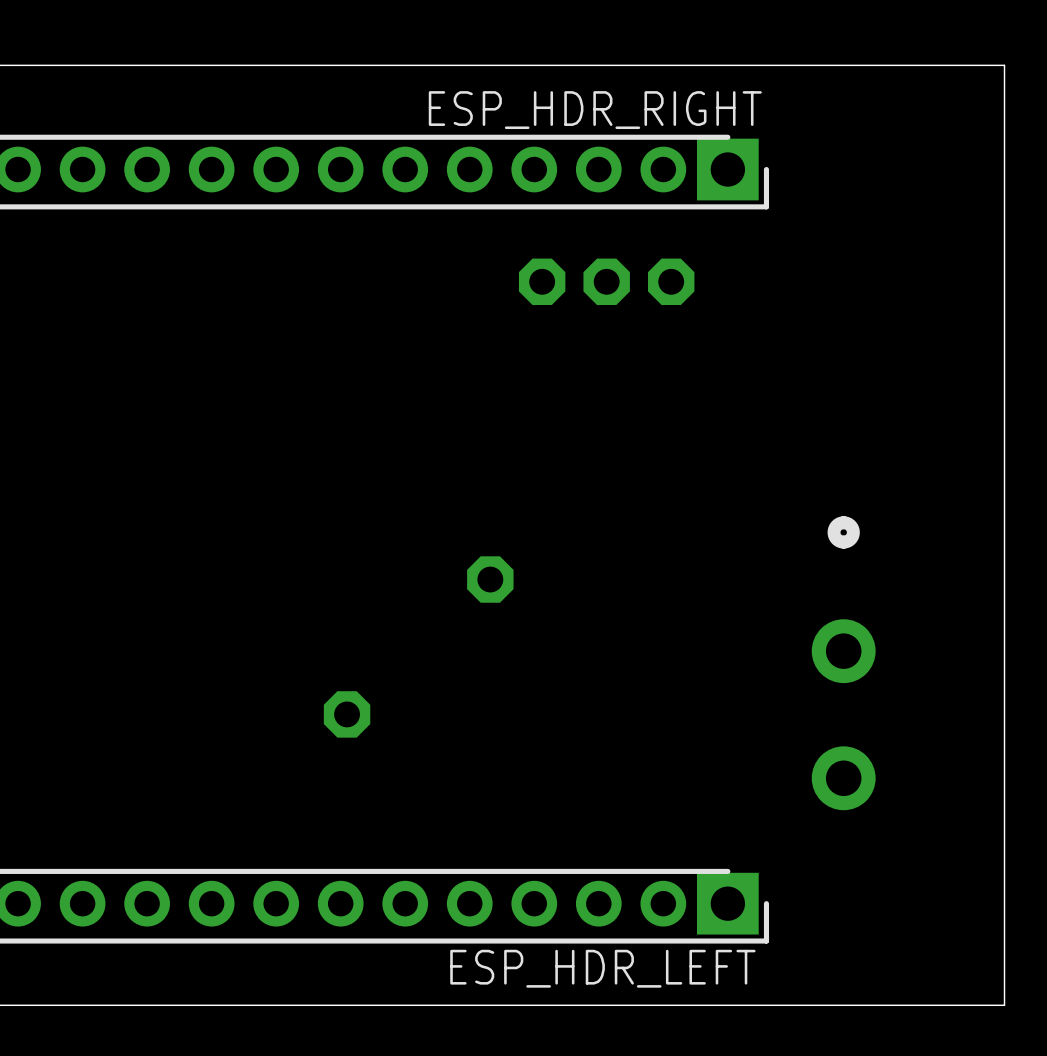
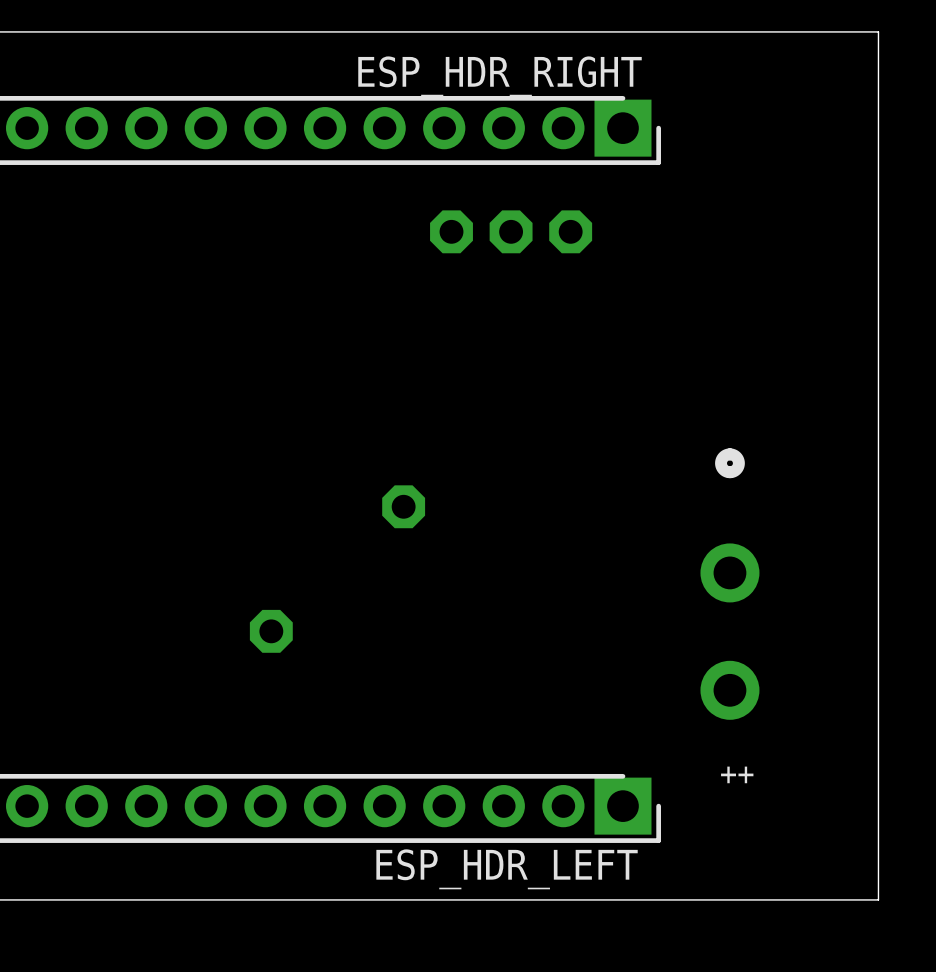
text: none -> ++ (737, 774)

